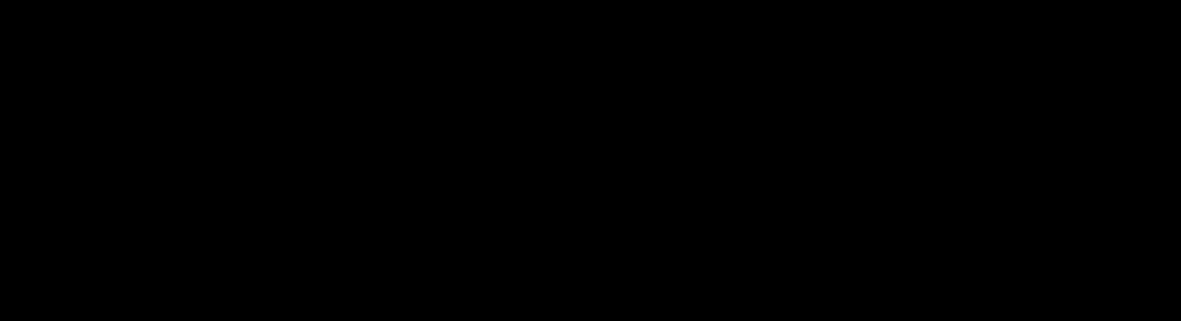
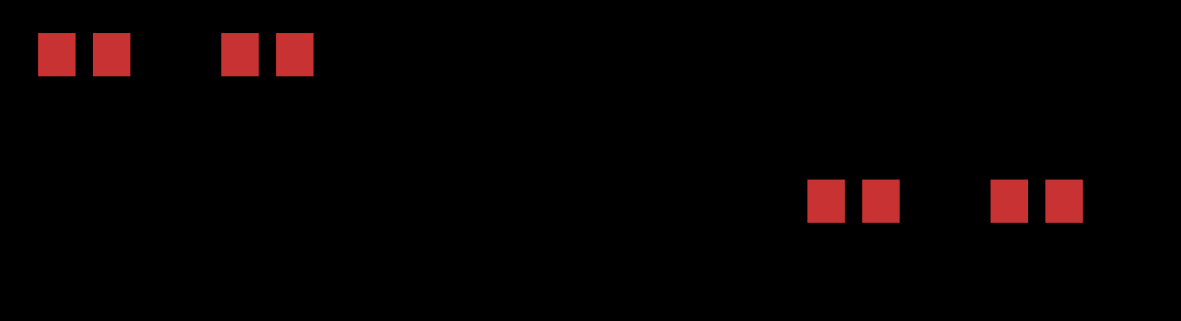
part: none -> (84, 54)
part: none -> (267, 54)
part: none -> (853, 201)
part: none -> (1036, 201)

